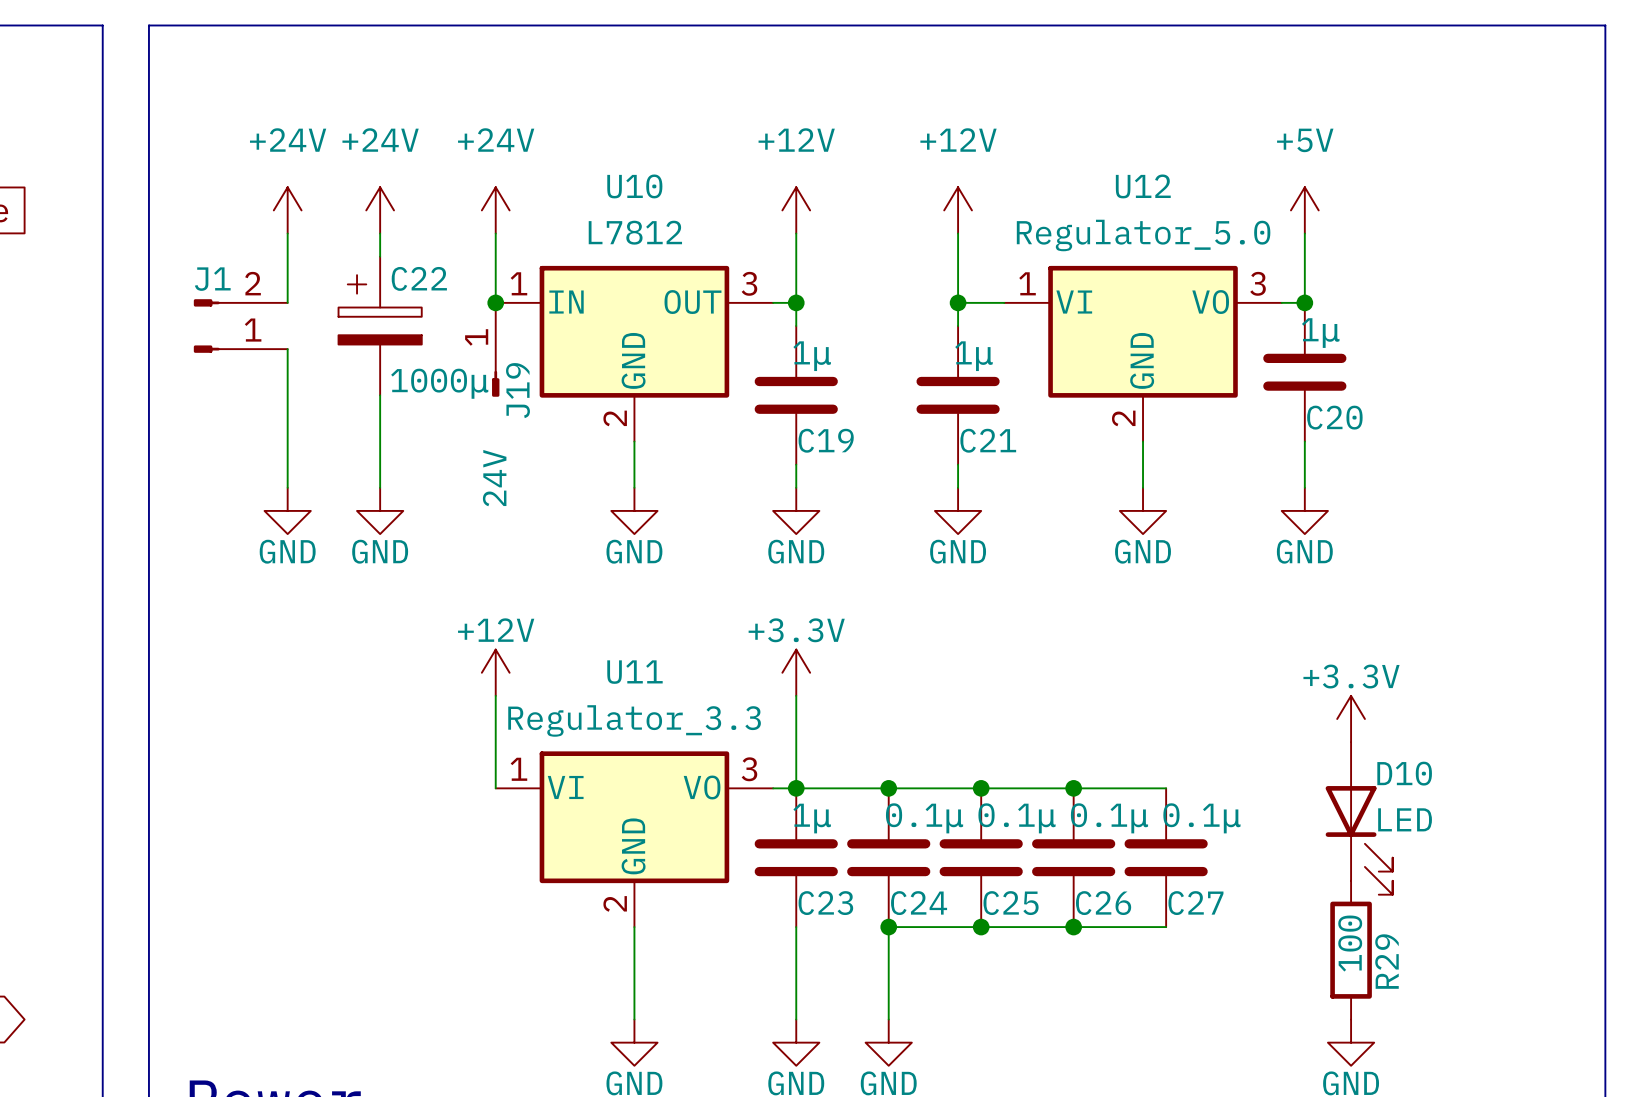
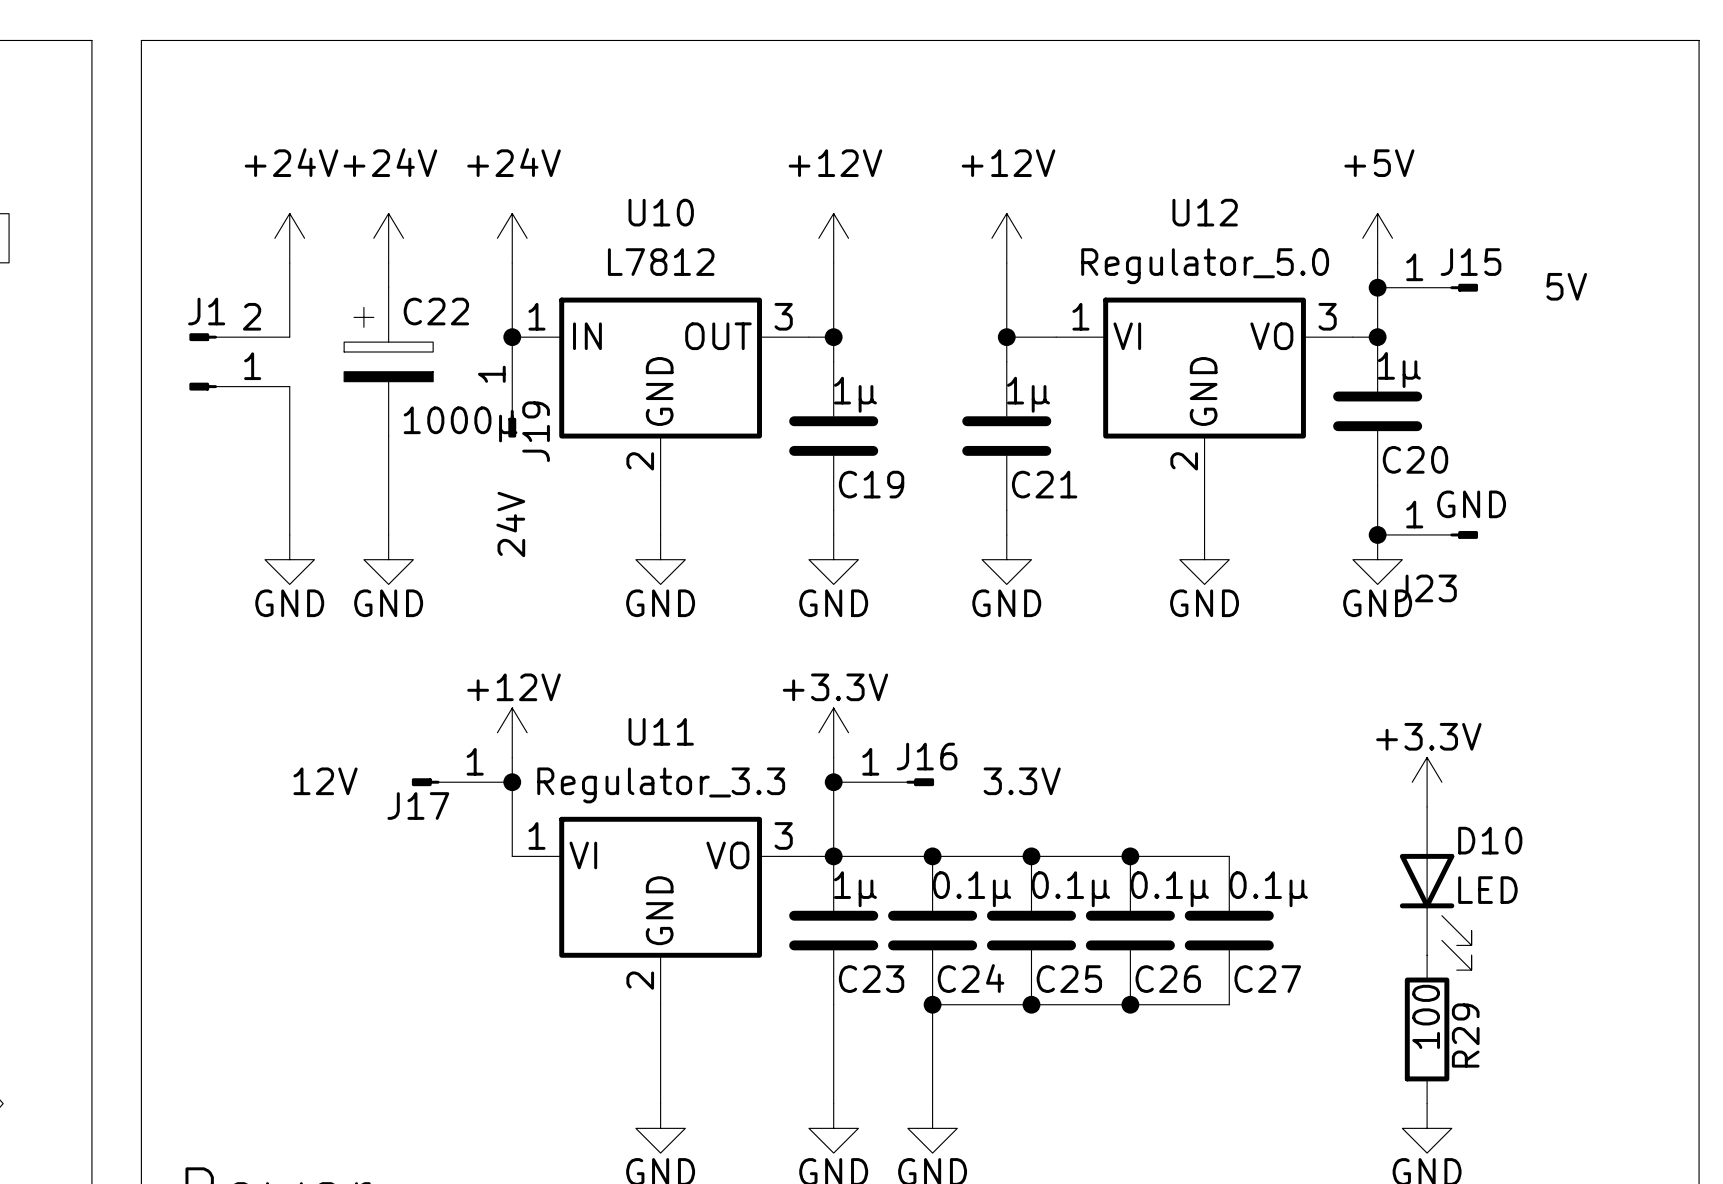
junction: none -> (1377, 287)
J15: none -> 5V (1427, 287)
junction: none -> (1377, 534)
J23: none -> GND (1427, 534)
J17: none -> 12V (462, 782)
junction: none -> (512, 782)
junction: none -> (833, 782)
J16: none -> 3.3V (883, 782)

